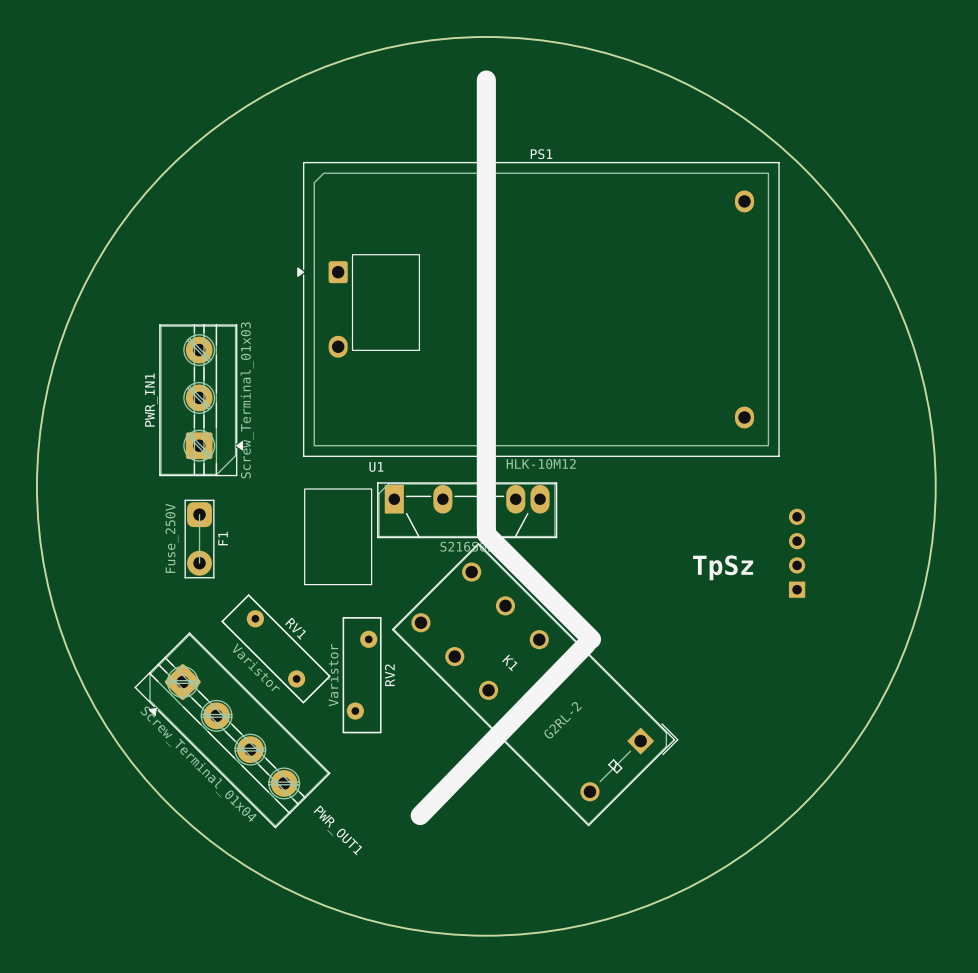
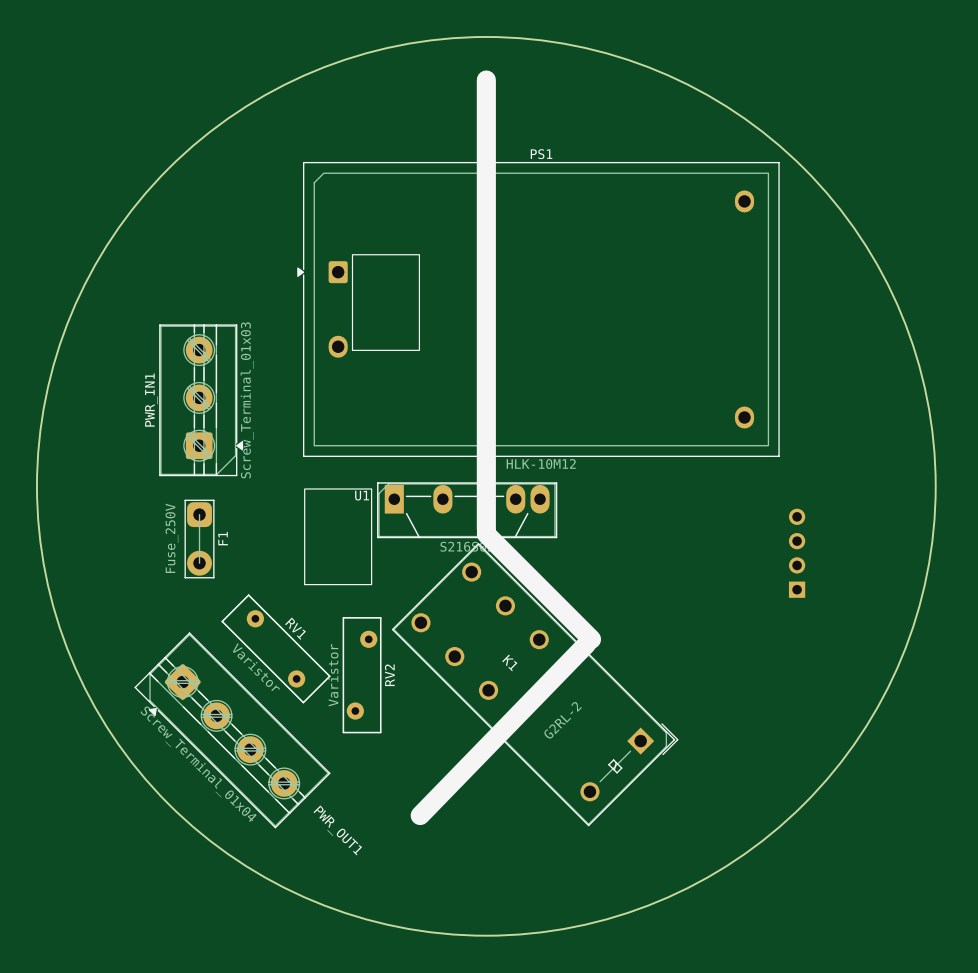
U1 name position: U1 (376, 466) -> U1 (362, 495)
text: TpSz (723, 567) -> none

